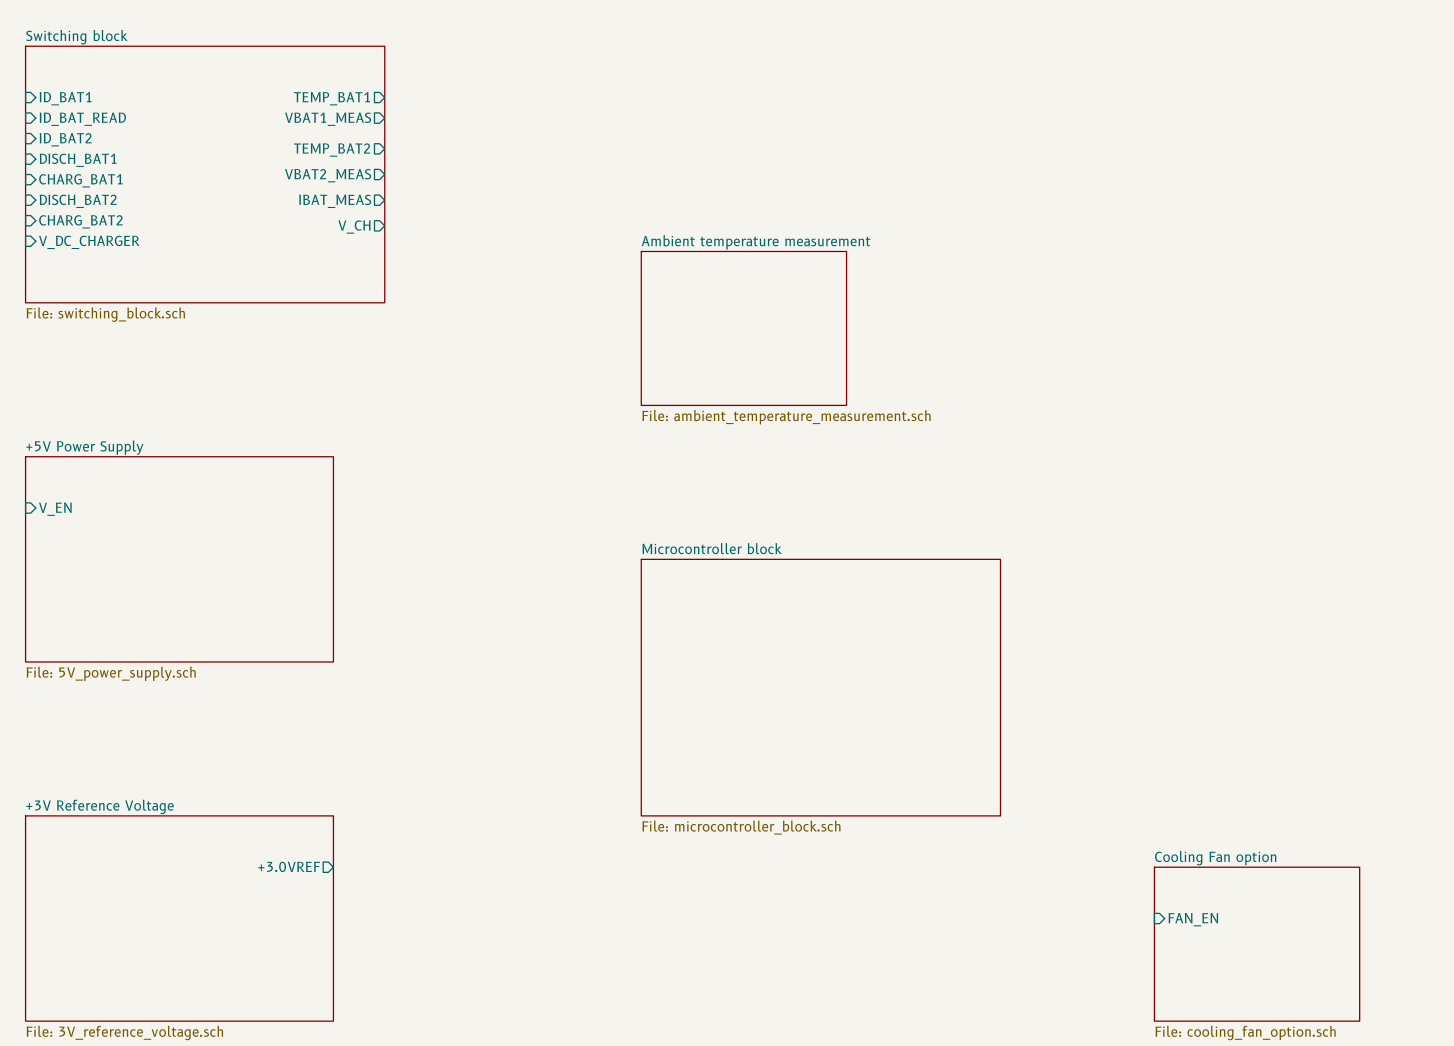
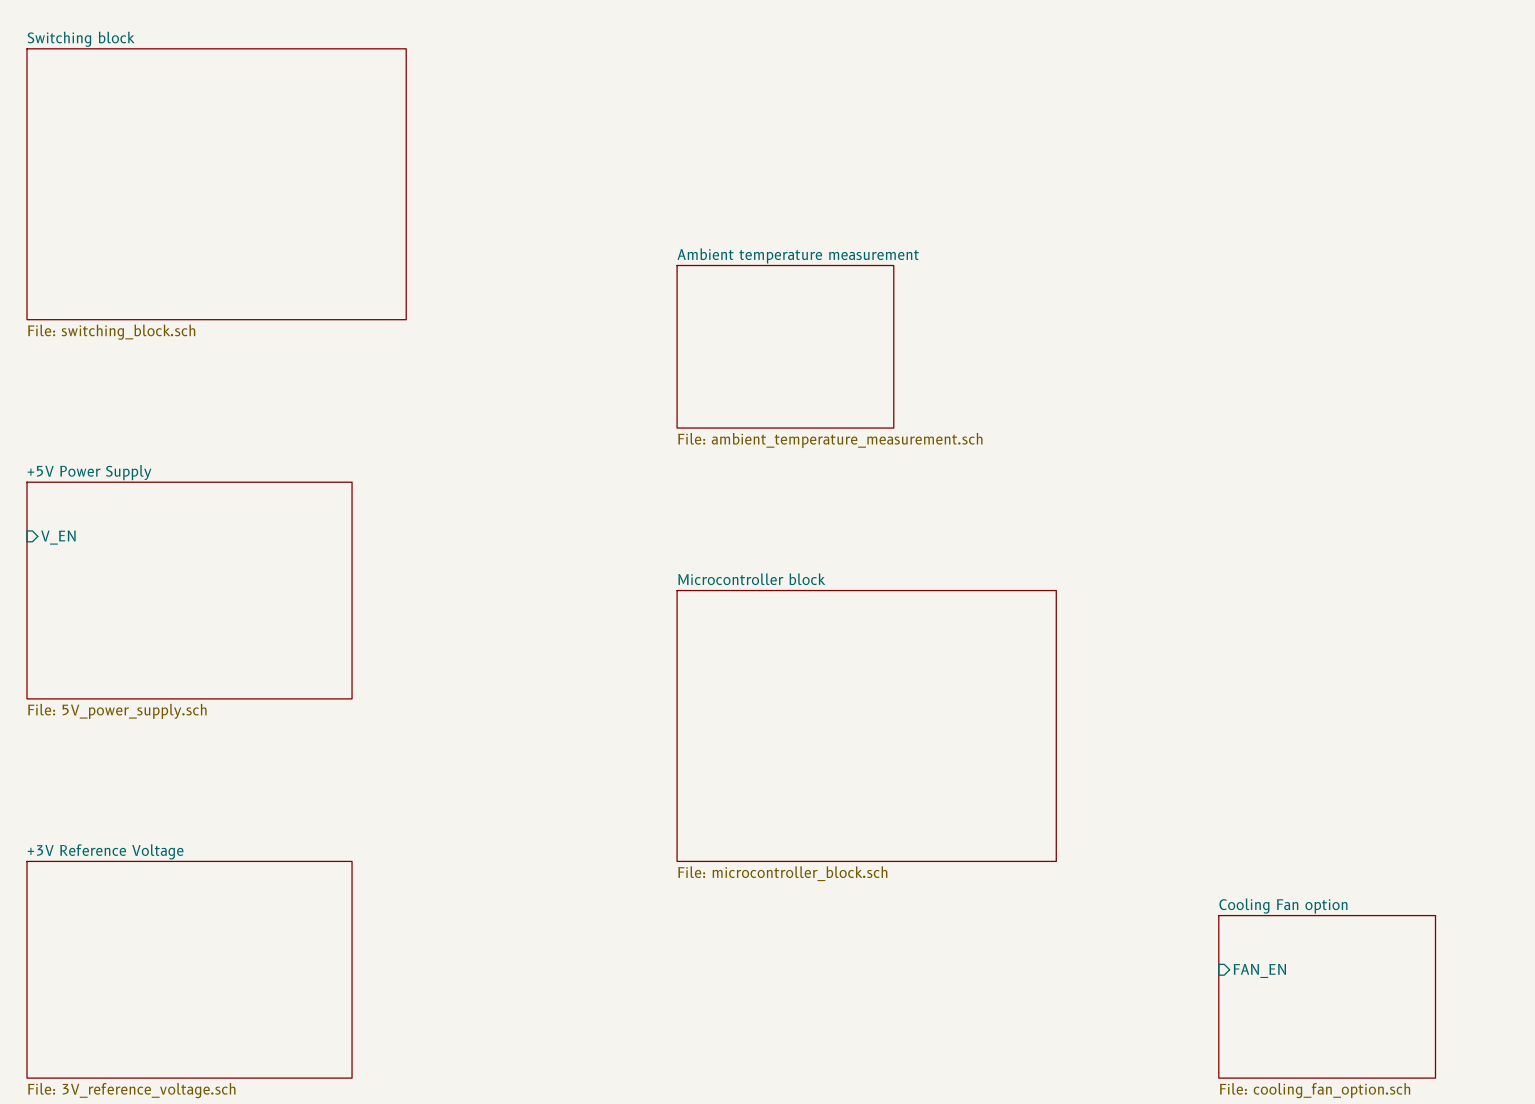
sheet pin: ID_BAT1 (65, 98) -> none
sheet pin: TEMP_BAT1 (331, 98) -> none
sheet pin: ID_BAT_READ (82, 119) -> none
sheet pin: VBAT1_MEAS (328, 119) -> none
sheet pin: ID_BAT2 (65, 139) -> none
sheet pin: TEMP_BAT2 (332, 150) -> none
sheet pin: DISCH_BAT1 (78, 160) -> none
sheet pin: VBAT2_MEAS (328, 175) -> none
sheet pin: CHARG_BAT1 (80, 180) -> none
sheet pin: DISCH_BAT2 (78, 201) -> none
sheet pin: IBAT_MEAS (335, 201) -> none
sheet pin: CHARG_BAT2 (80, 221) -> none
sheet pin: V_CH (354, 226) -> none
sheet pin: V_DC_CHARGER (89, 242) -> none
sheet pin: +3.0VREF (289, 866) -> none

